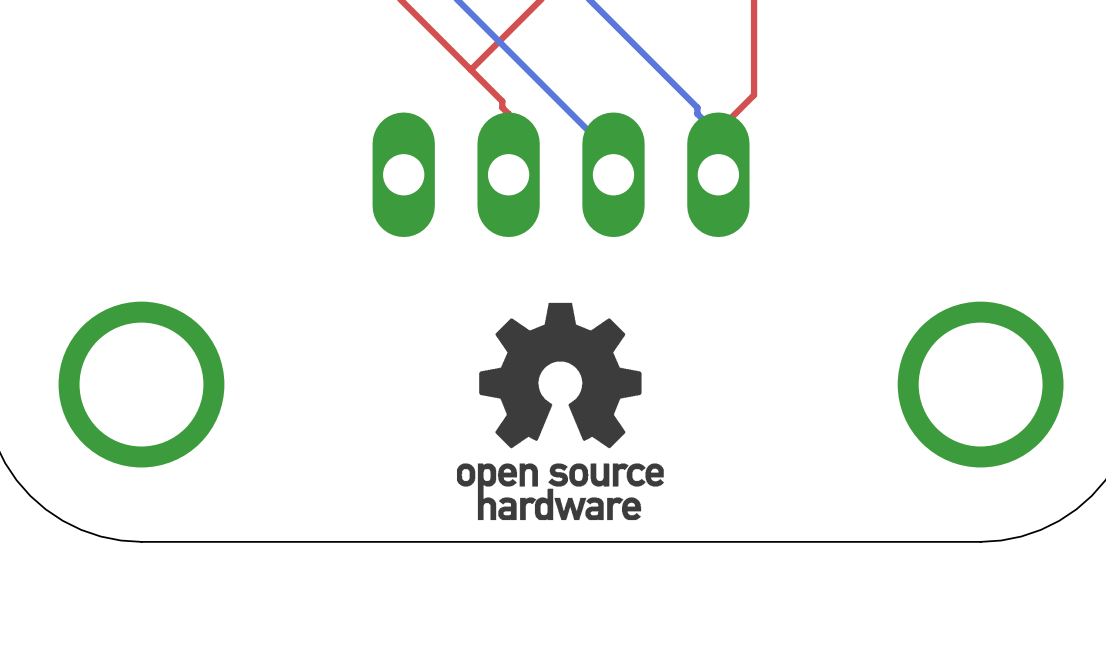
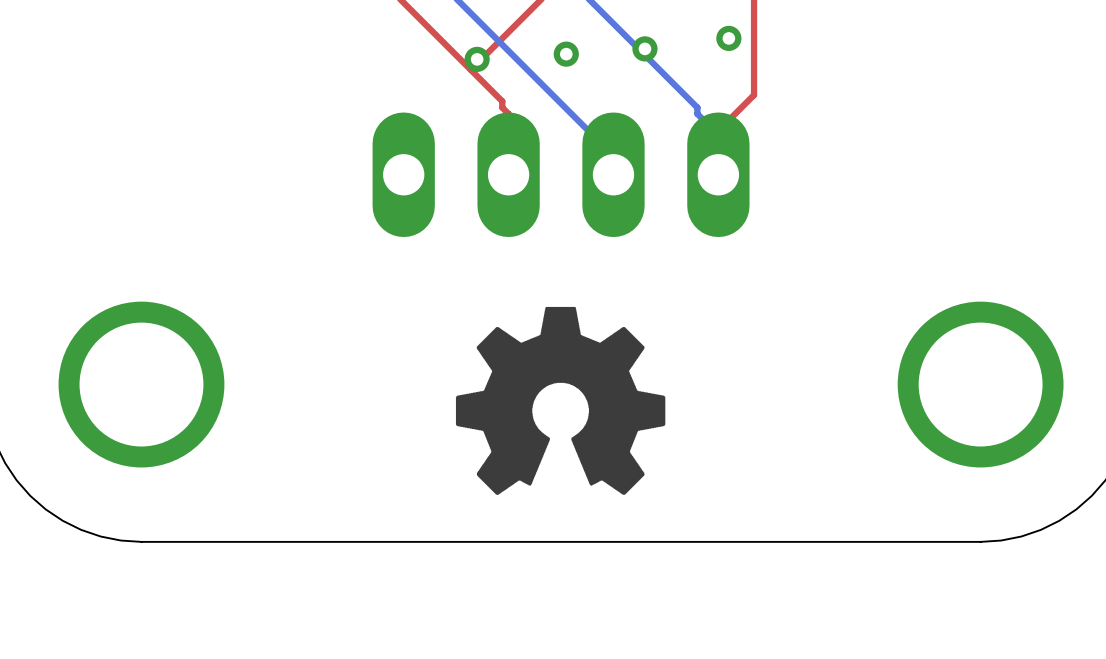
via: none -> (728, 38)
via: none -> (644, 48)
via: none -> (566, 54)
via: none -> (477, 59)
drawing shape: [456, 302, 664, 521] -> [455, 306, 666, 495]

